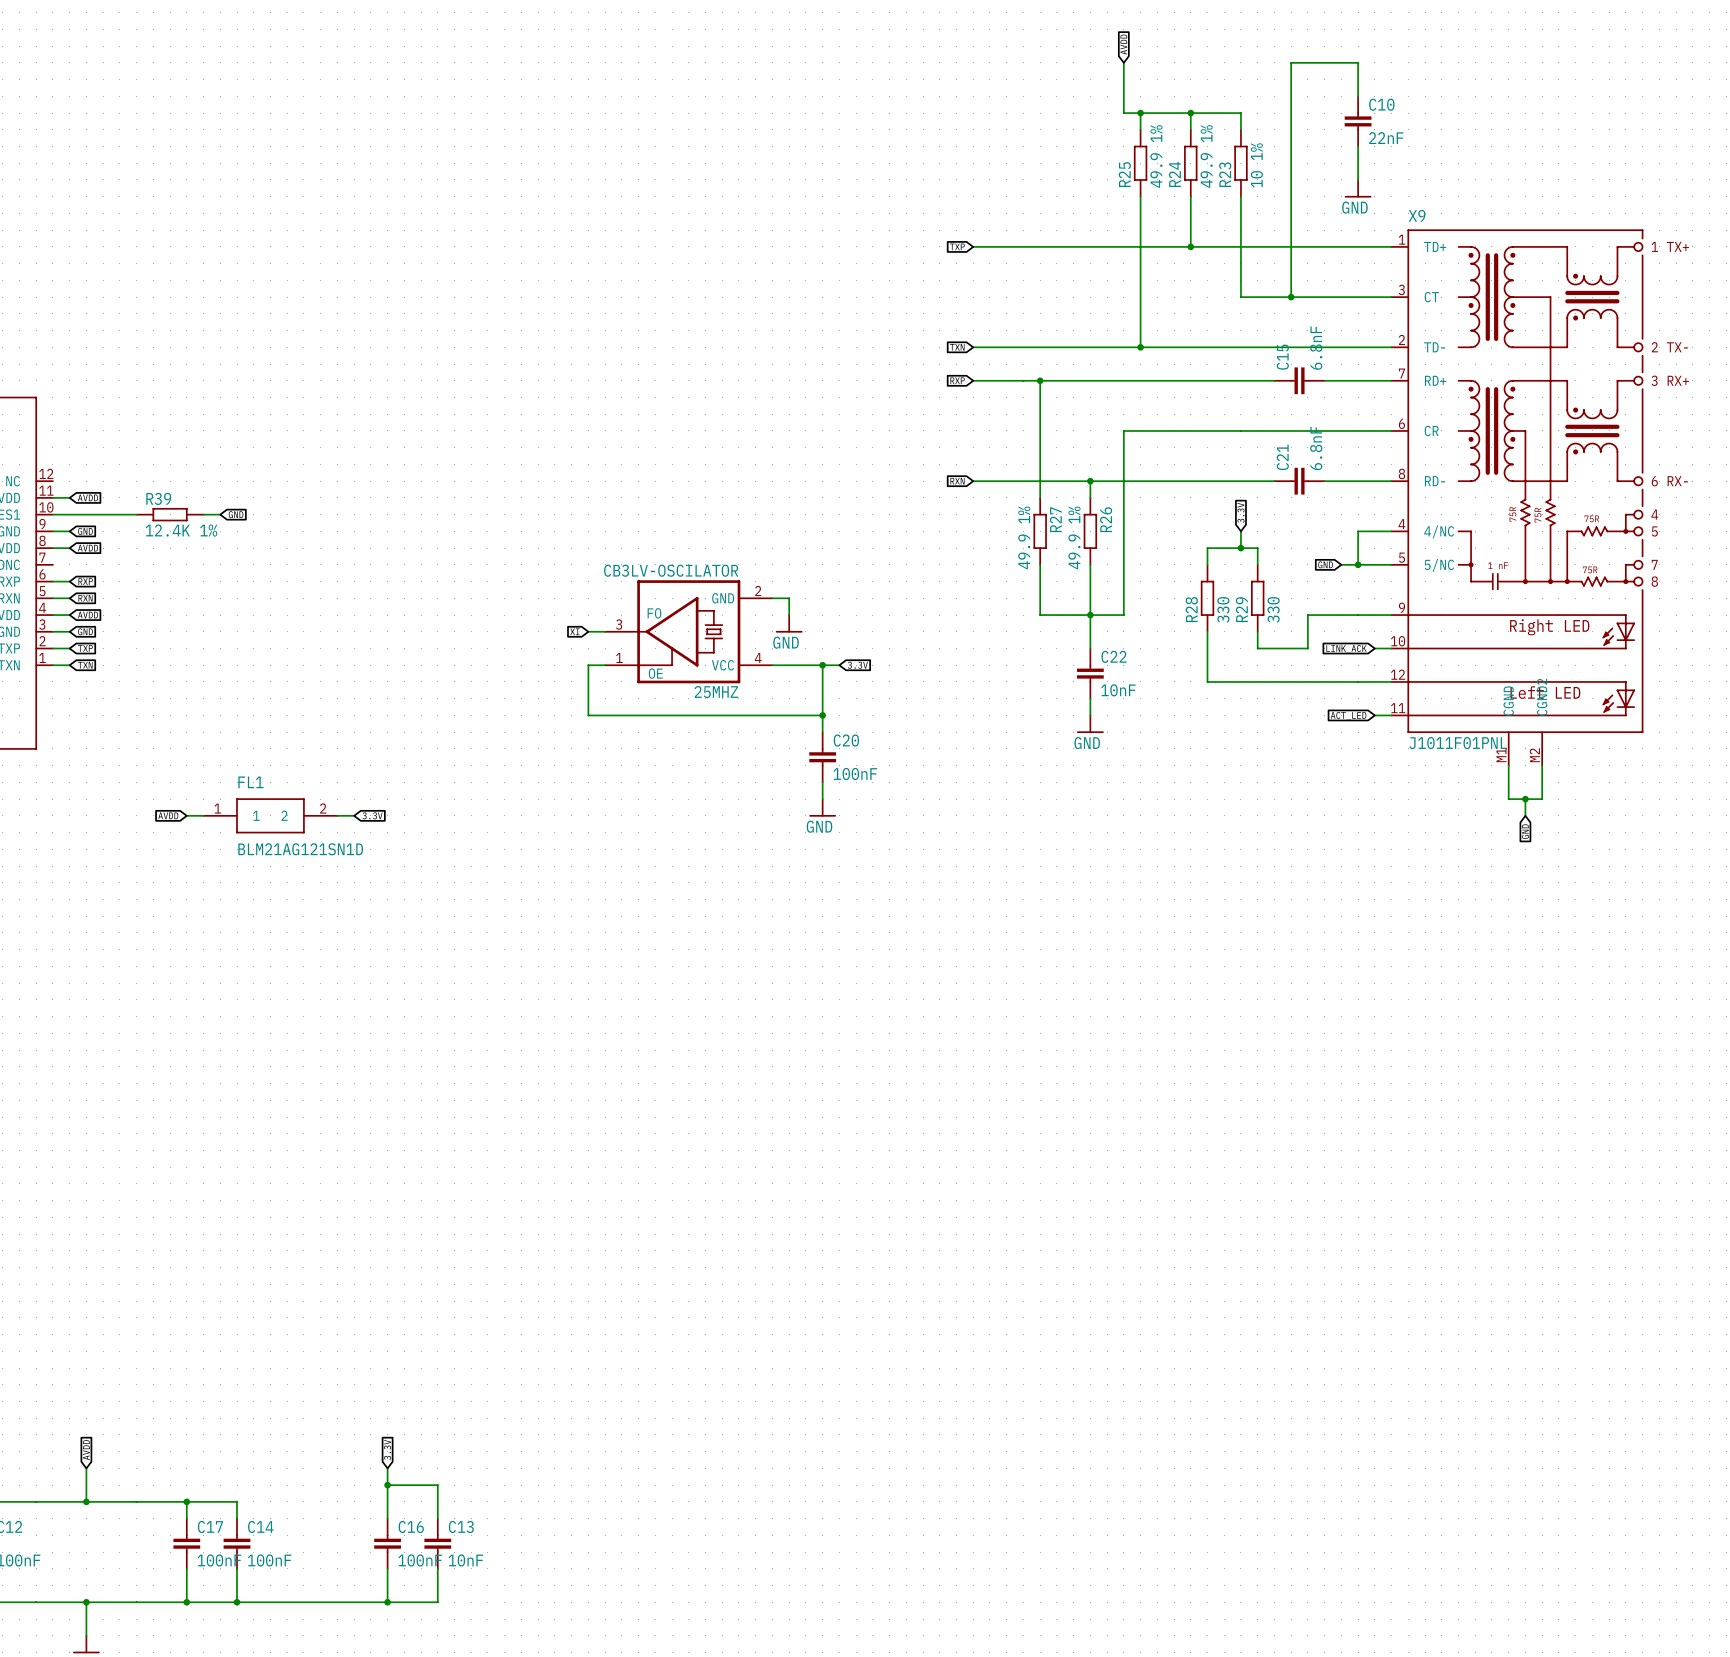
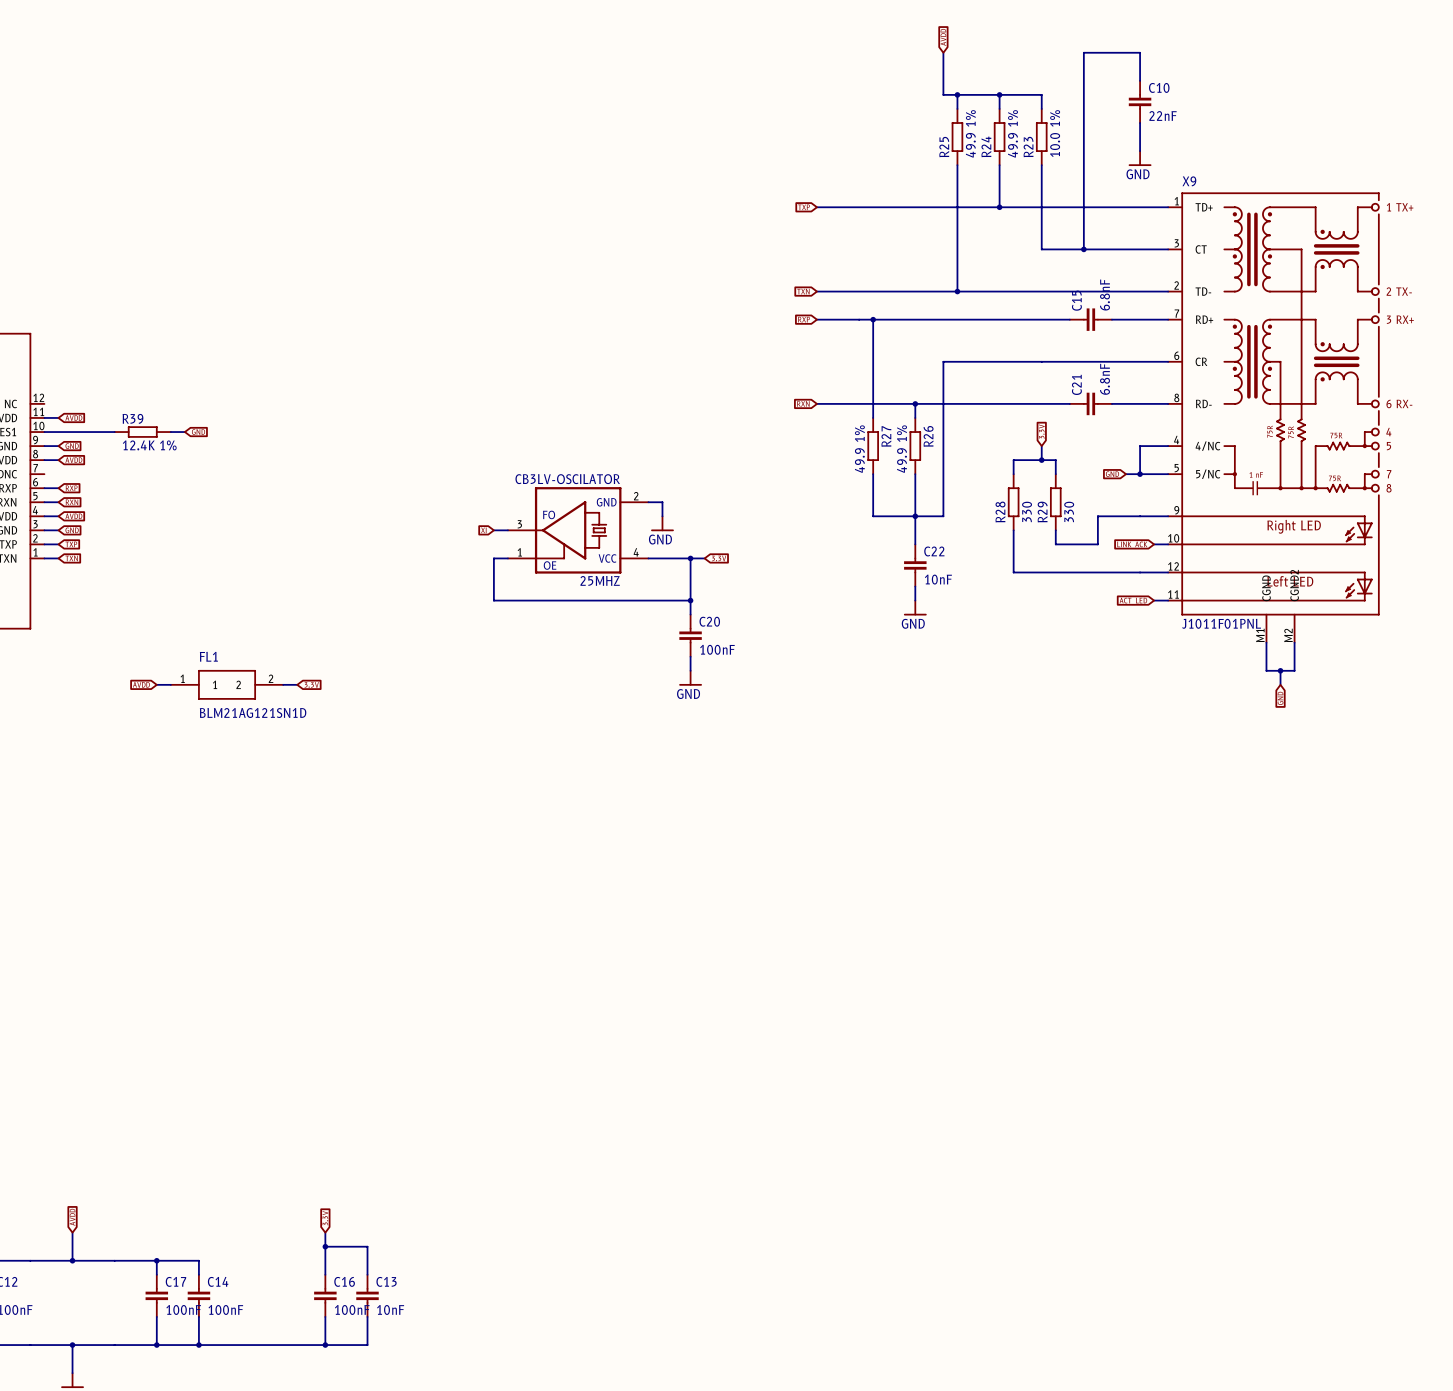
R23 value: 10 1% (1256, 165) -> 10.0 1% (1055, 133)

